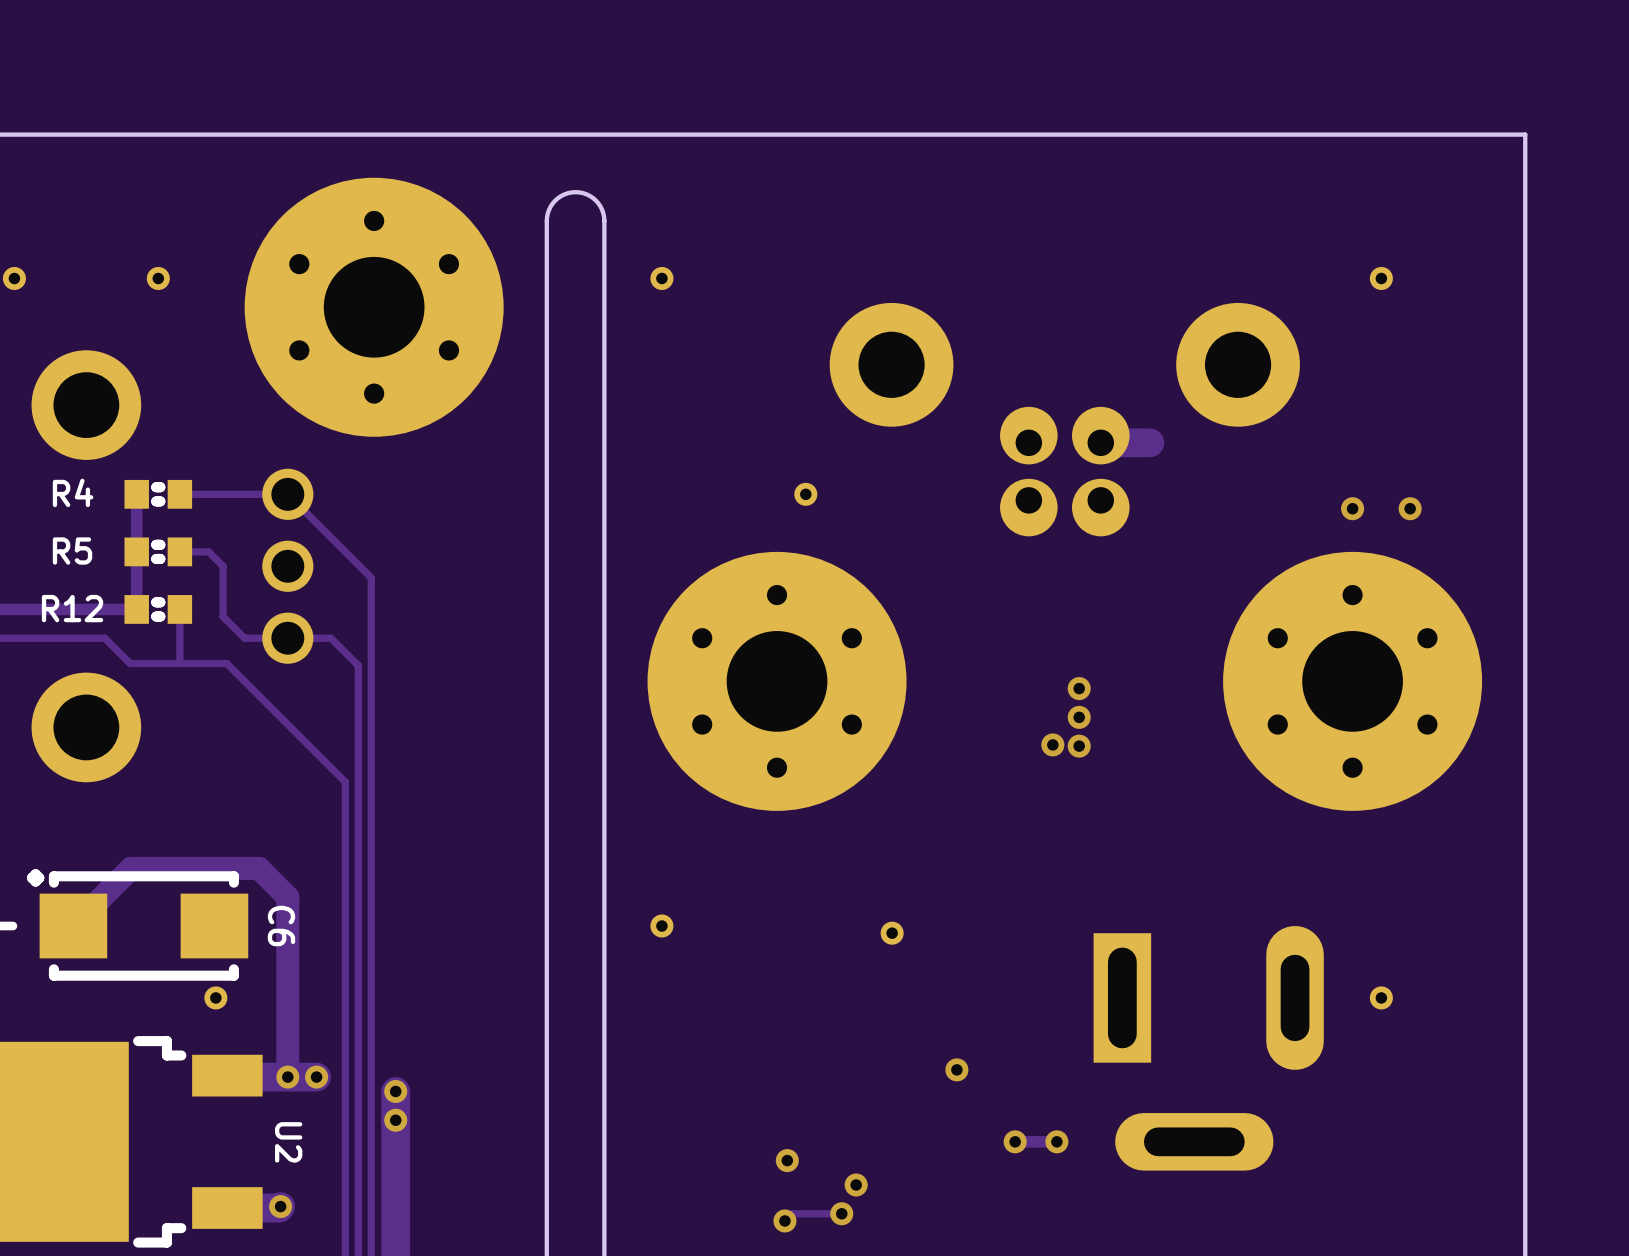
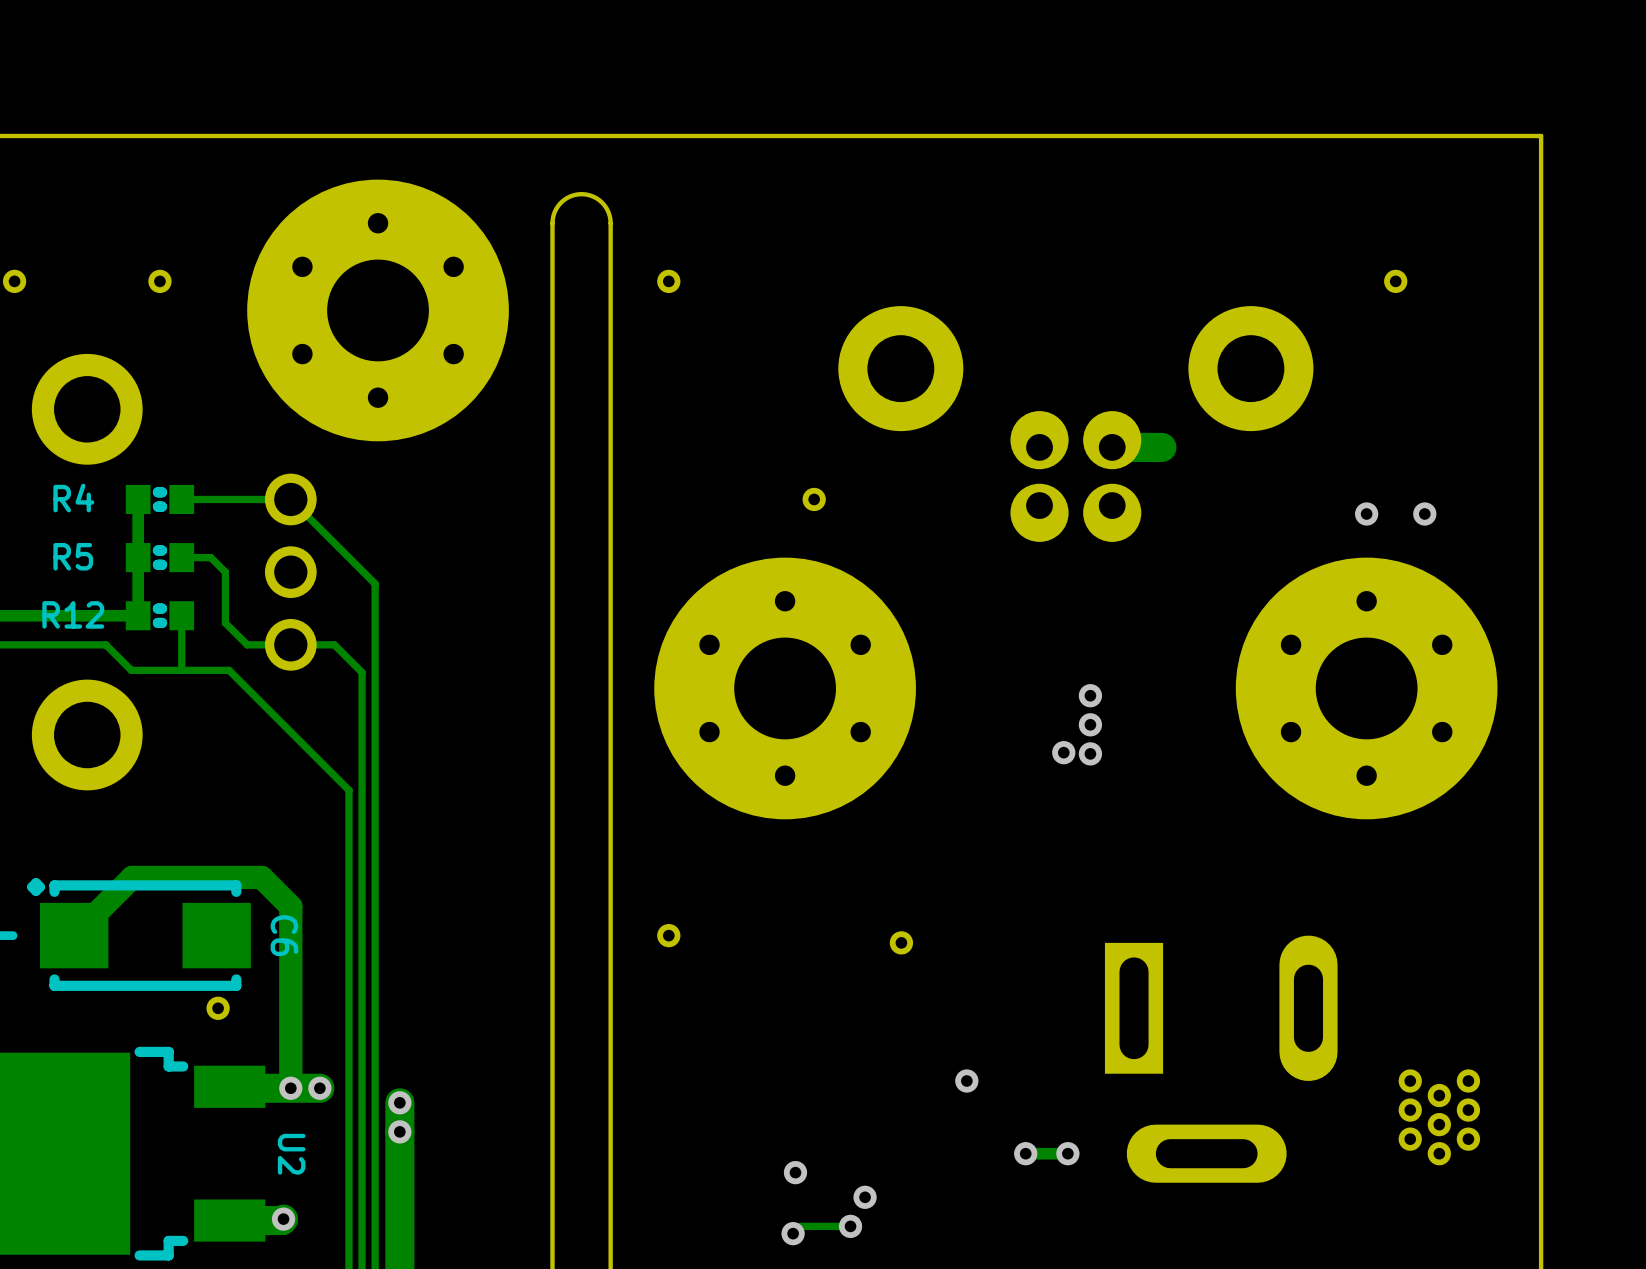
part: (1381, 997) -> none
part: none -> (1410, 1081)
part: none -> (1468, 1081)
part: none -> (1439, 1095)
part: none -> (1410, 1110)
part: none -> (1468, 1110)
part: none -> (1439, 1124)
part: none -> (1410, 1139)
part: none -> (1468, 1139)
part: none -> (1439, 1153)

